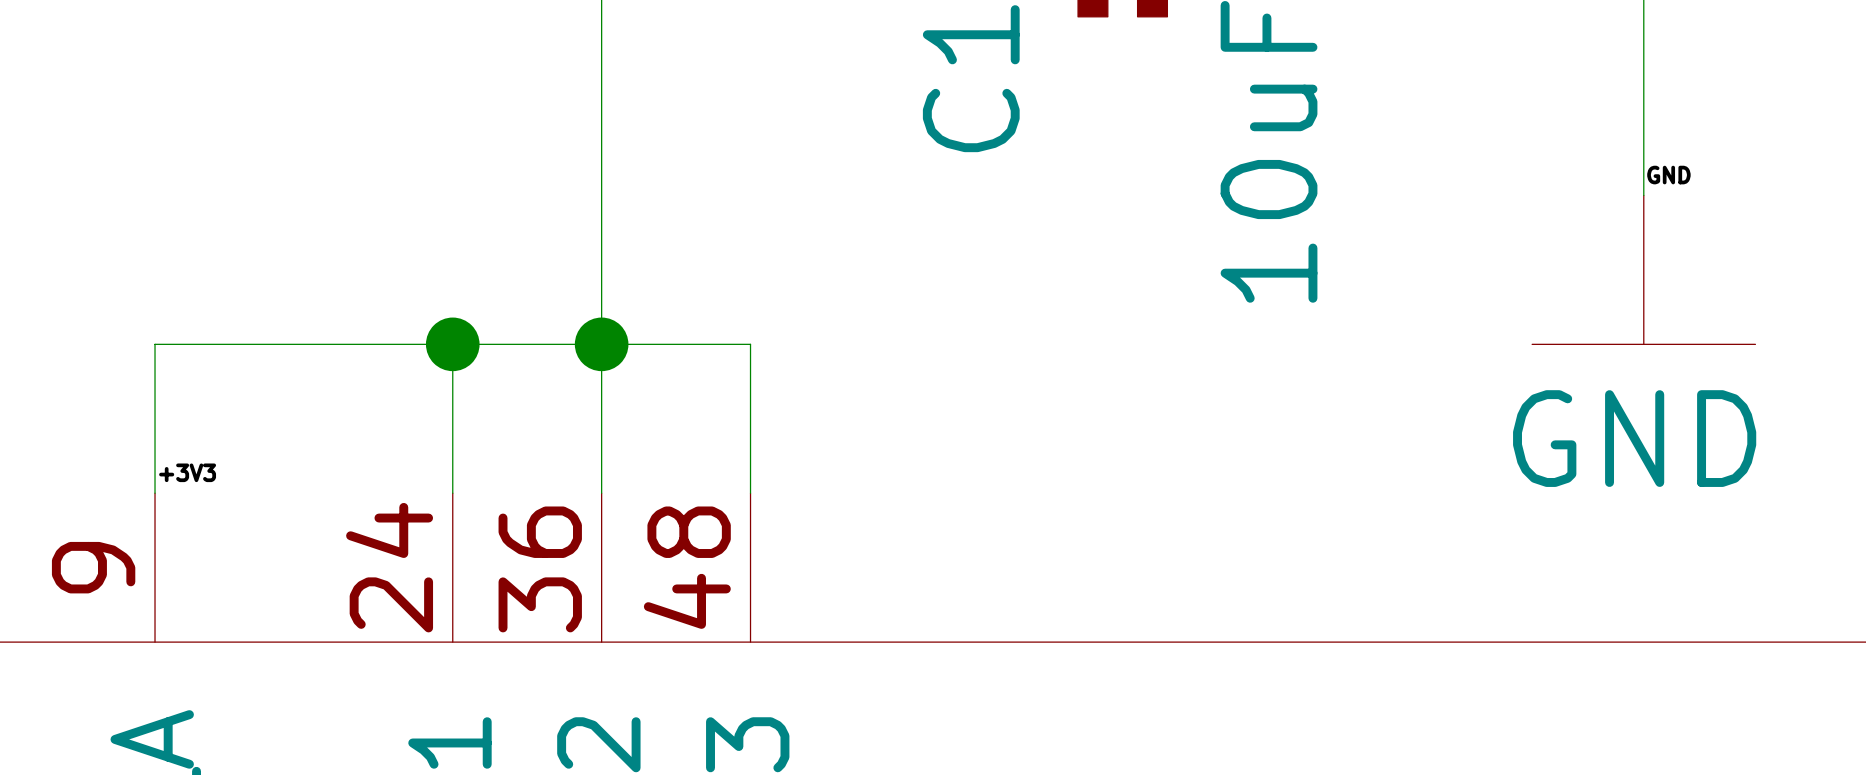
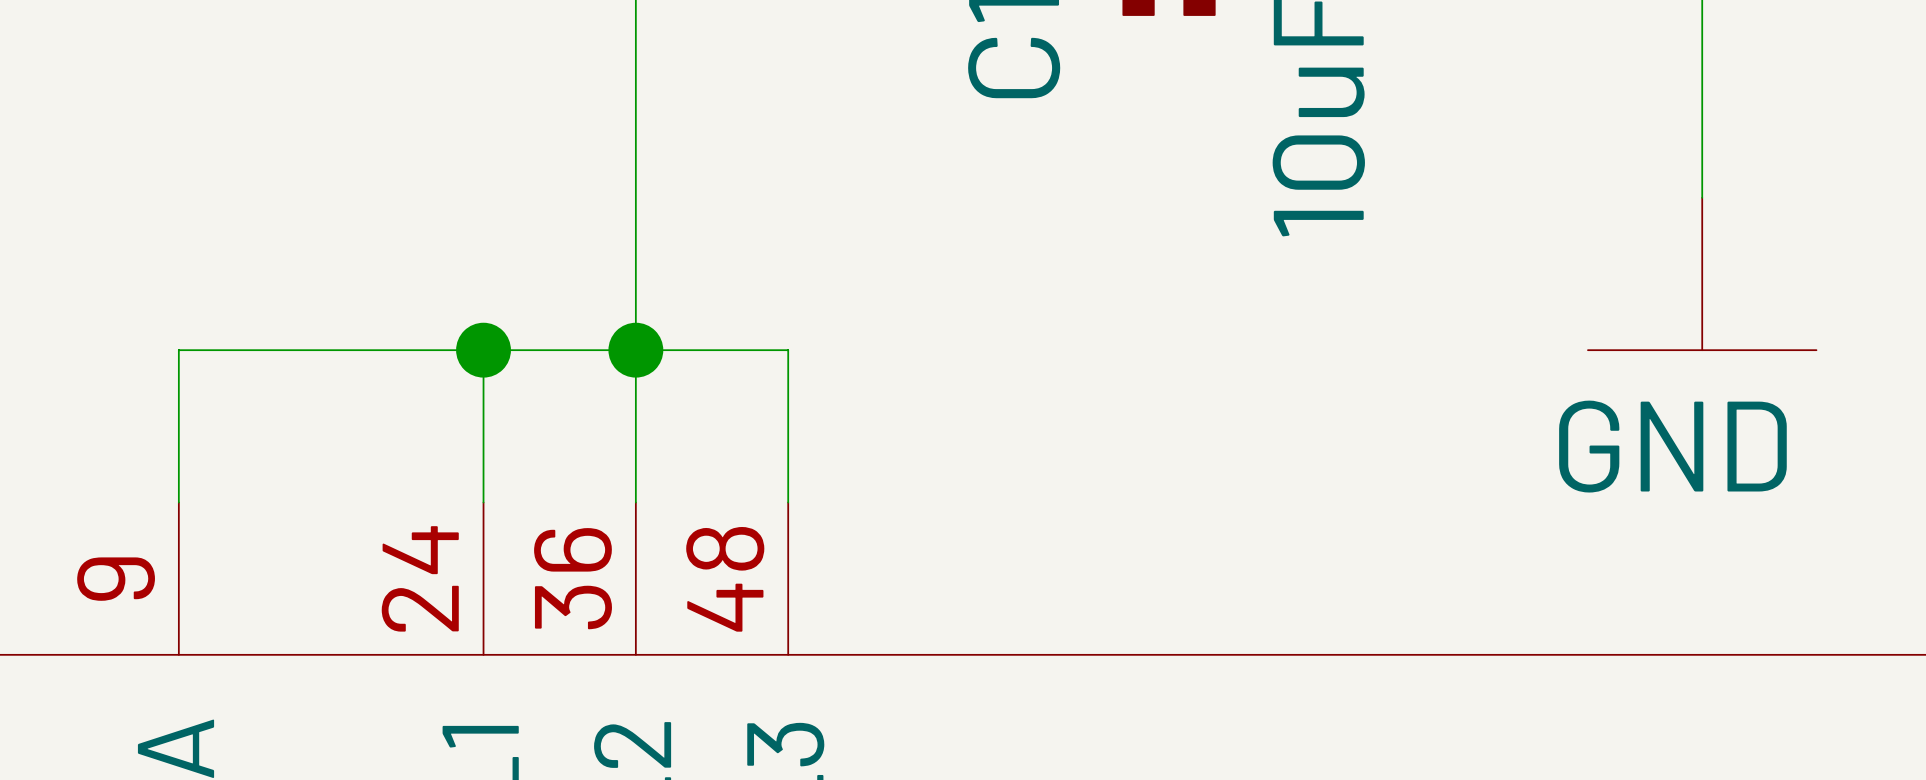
label: GND (1668, 175) -> none
label: +3V3 (187, 472) -> none

